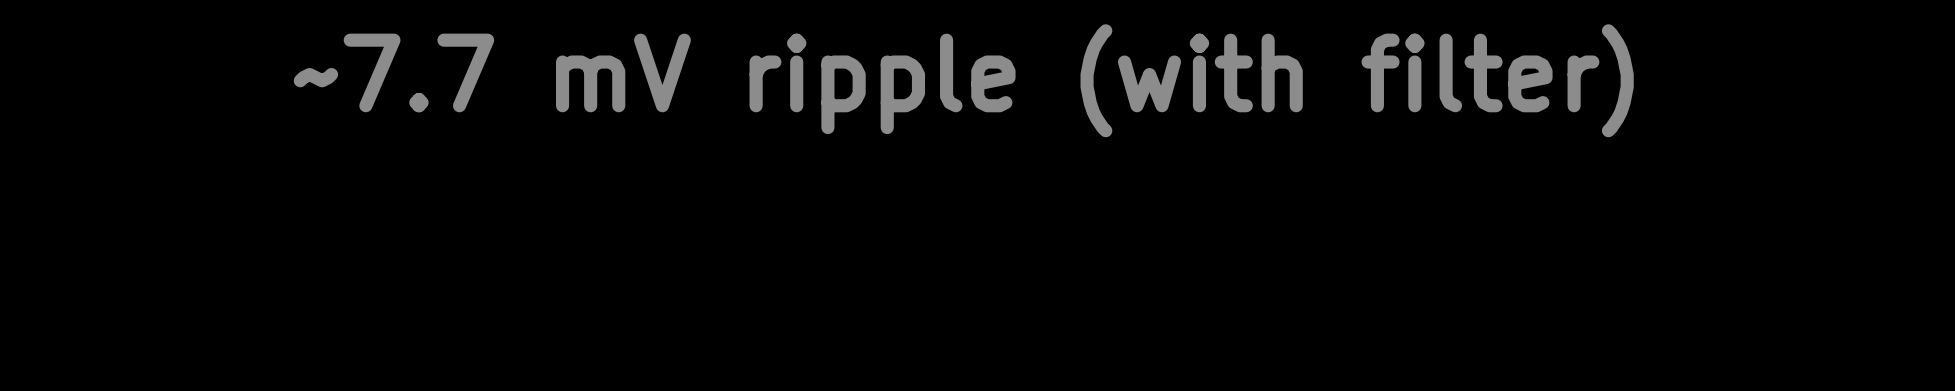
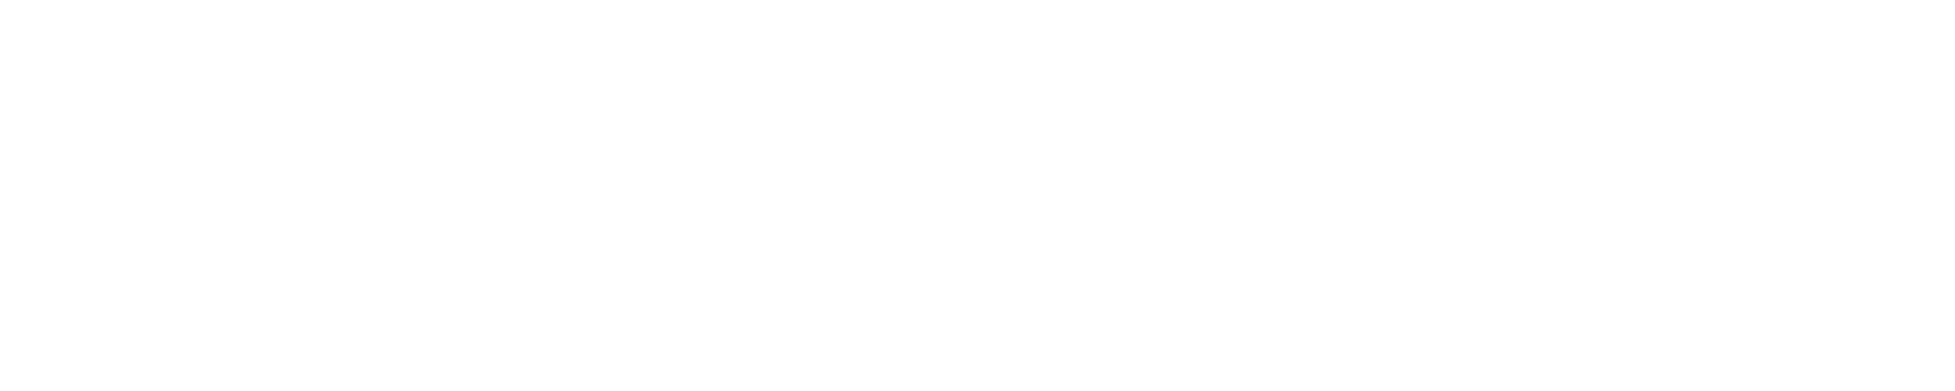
text: ~7.7 mV ripple (with filter) (963, 80) -> none

